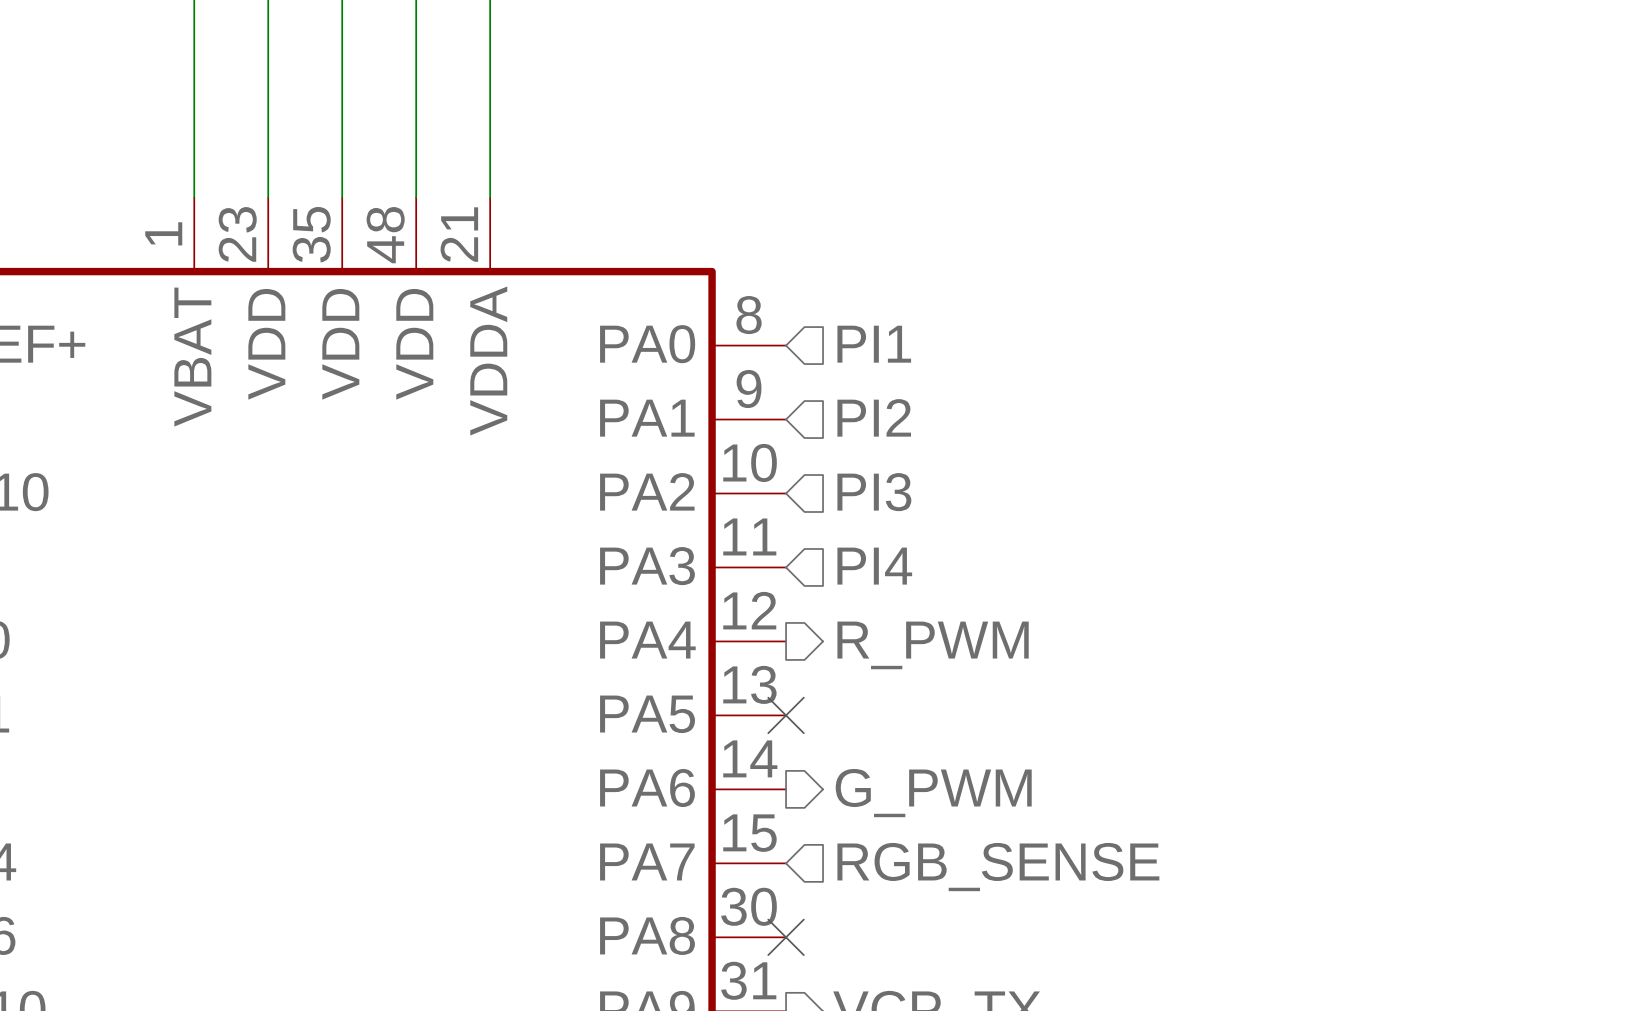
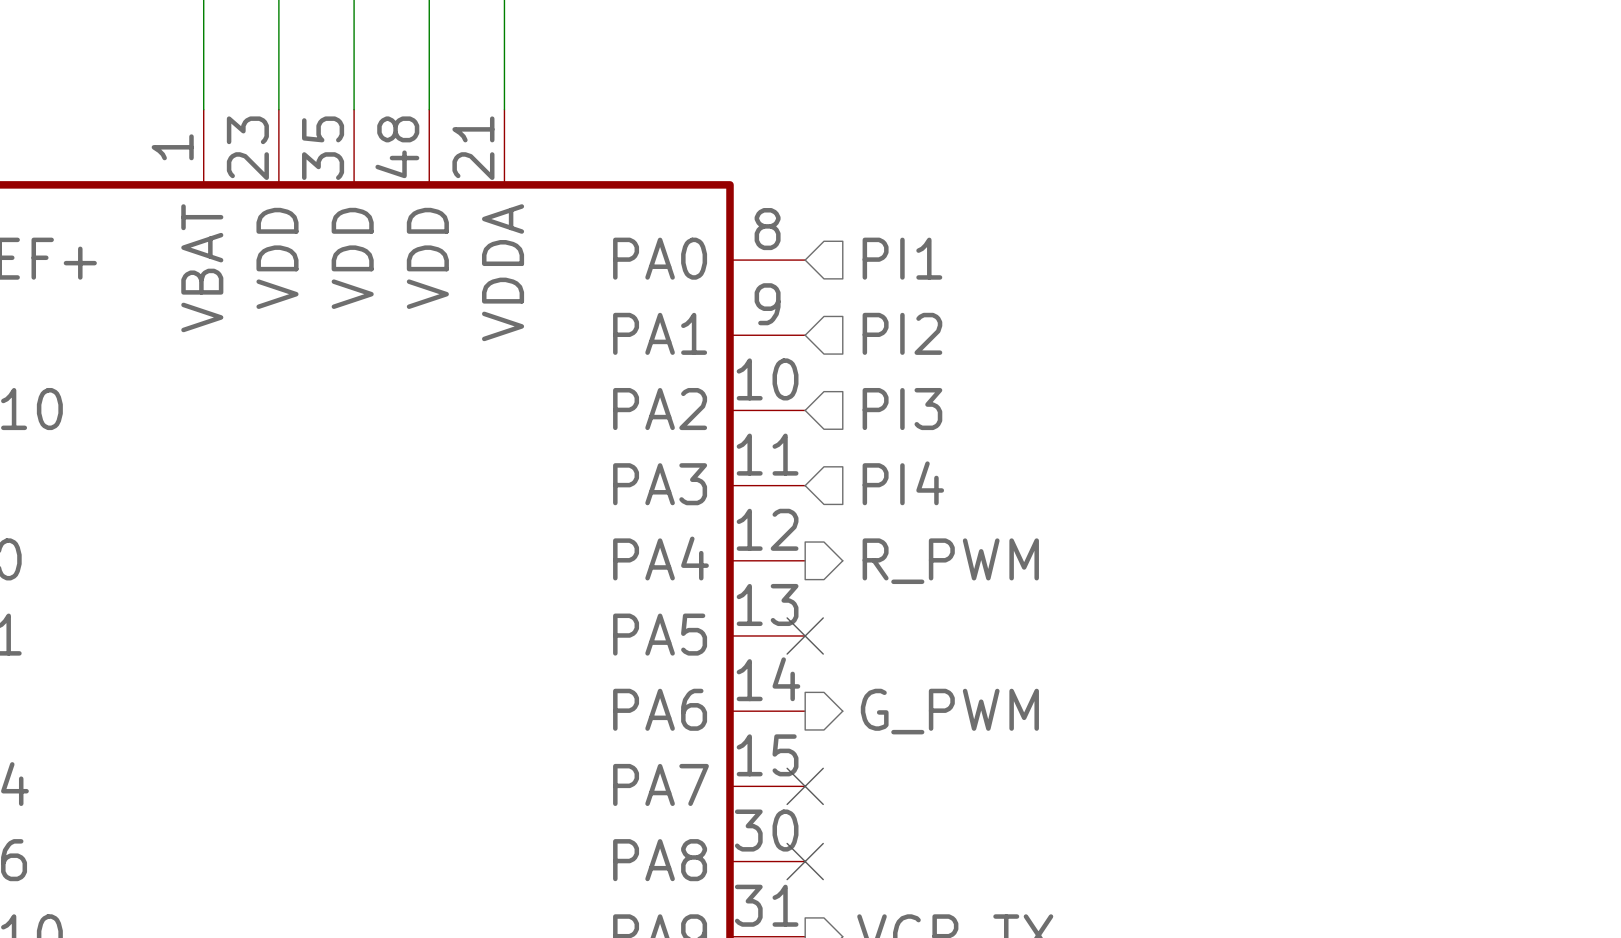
no-connect mark: none -> (805, 786)
hierarchical label: RGB_SENSE (998, 867) -> none

